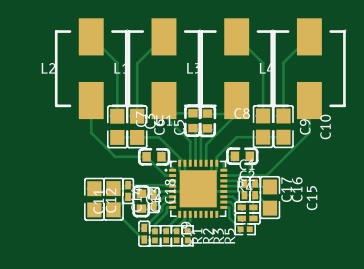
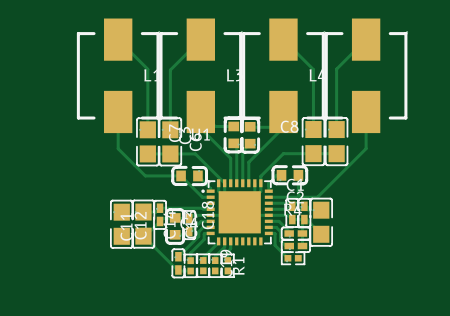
L2 name: L2 (48, 68) -> none
C9 name: C9 (305, 126) -> none
C10 name: C10 (325, 126) -> none
C5 name: C5 (179, 127) -> none
C17 name: C17 (286, 189) -> none
C16 name: C16 (297, 189) -> none
C15 name: C15 (312, 198) -> none
R2 name: R2 (208, 236) -> none
R3 name: R3 (218, 236) -> none
R5 name: R5 (229, 236) -> none

